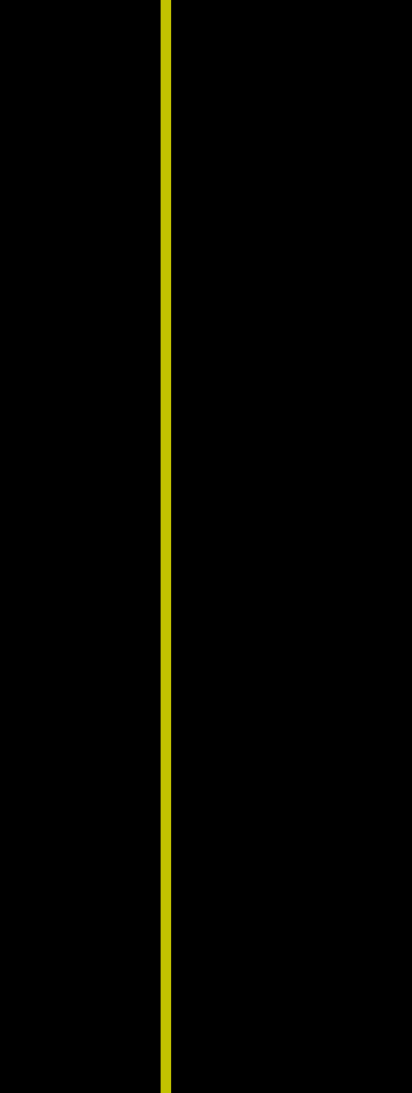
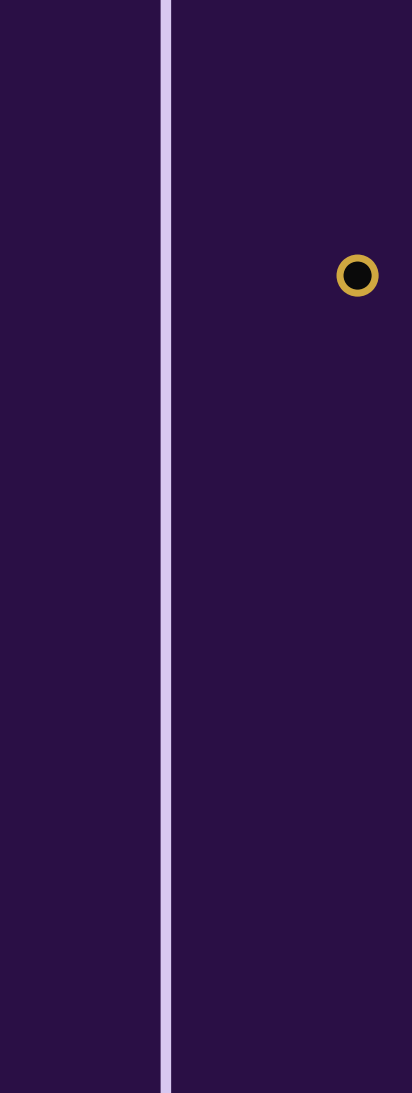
via: none -> (357, 275)

